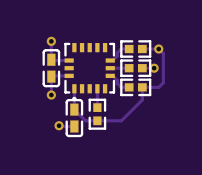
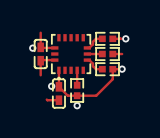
via: (51, 41) -> none
track: (153, 49) (158, 49) (163, 53) (163, 82) (158, 87) (154, 87) -> none
via: none -> (32, 48)
via position: (154, 68) -> (122, 69)
via: (51, 95) -> none
via: none -> (51, 86)
via: (59, 125) -> none
via: none -> (77, 105)

